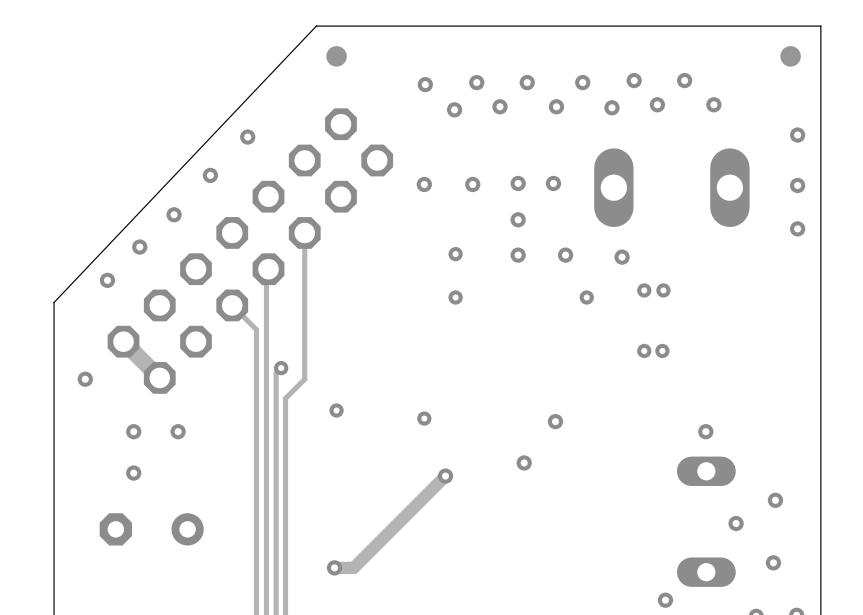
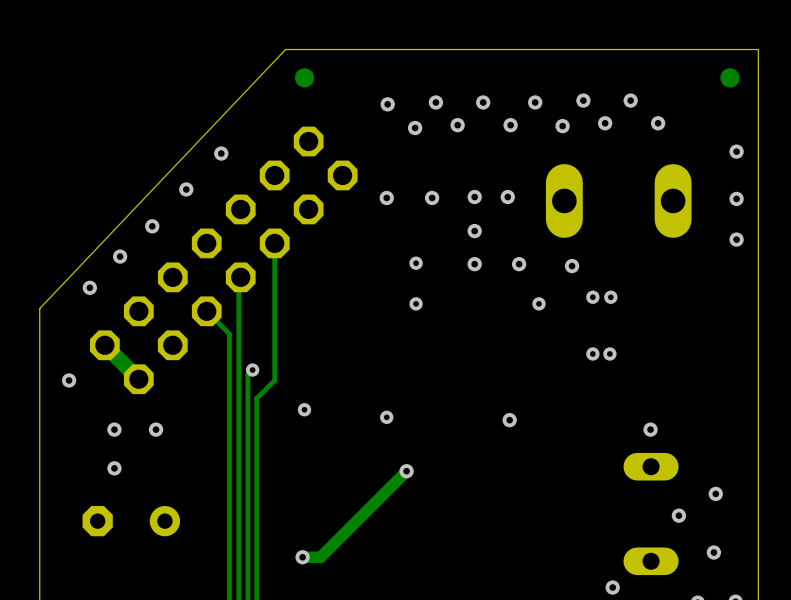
via: (524, 462) -> none

